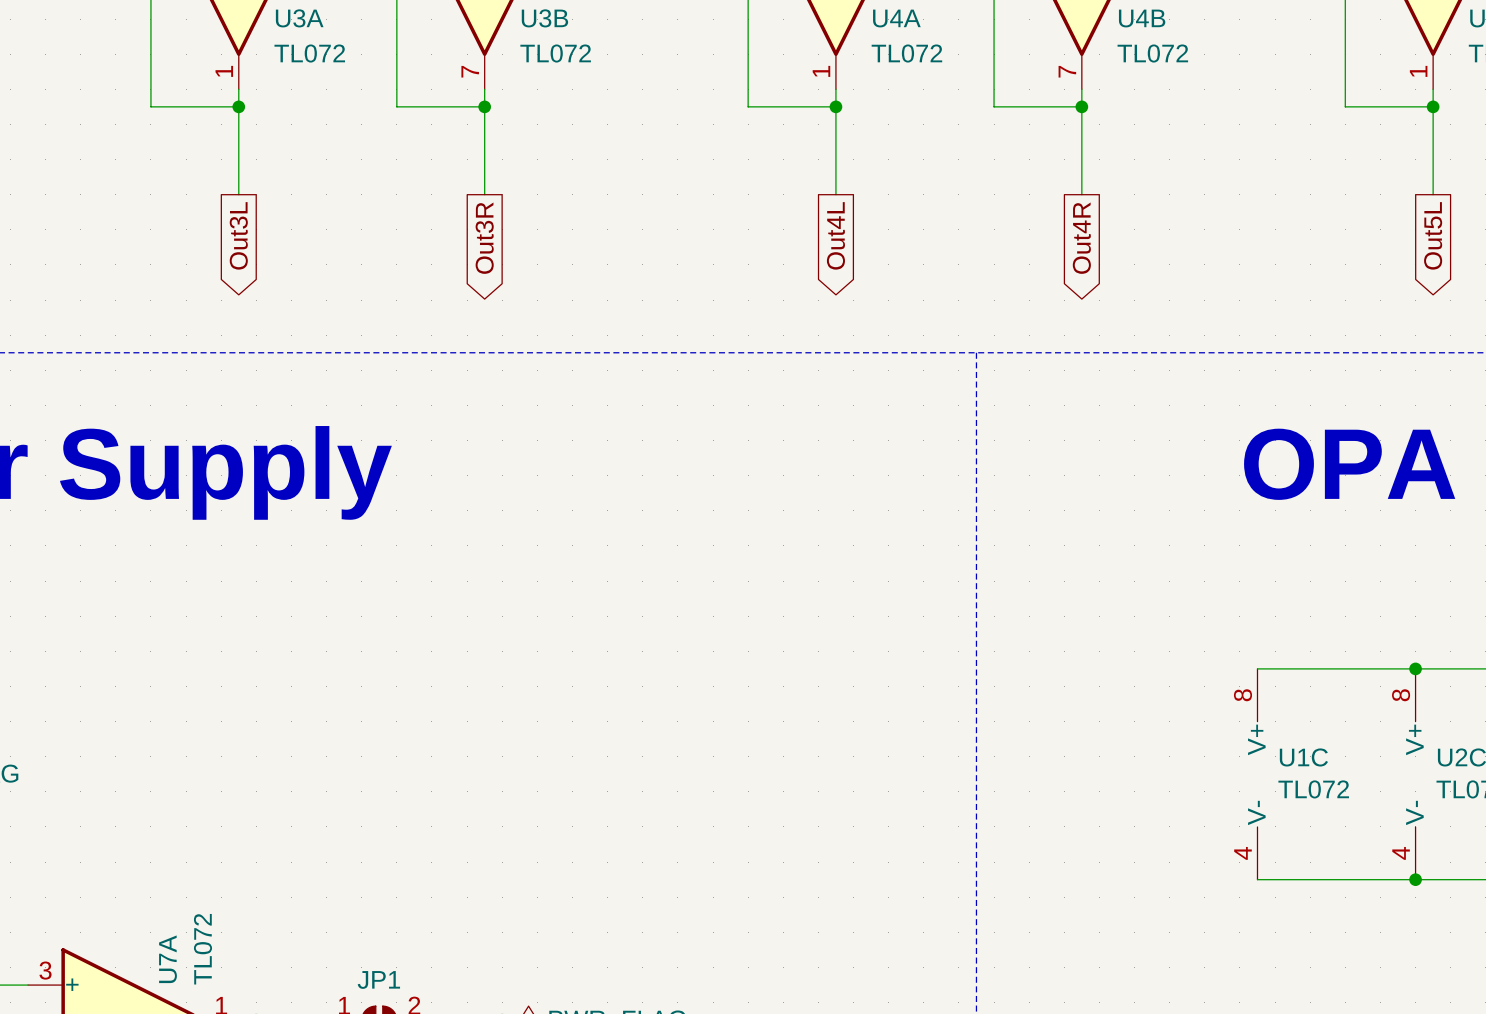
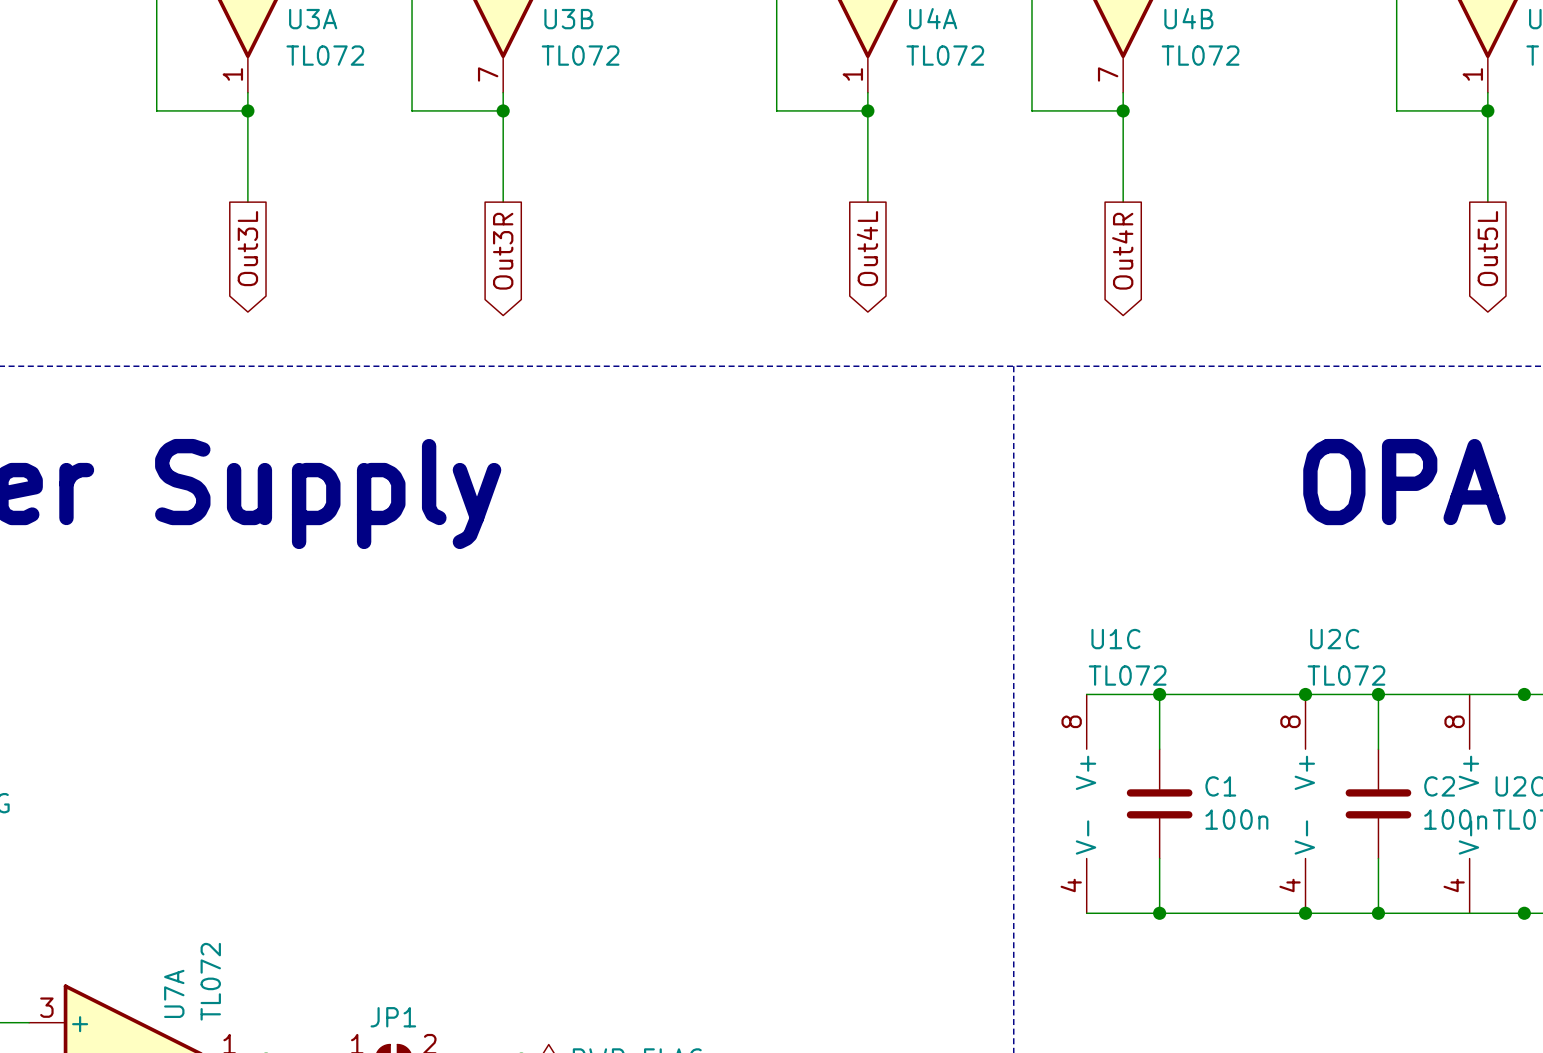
wire: none -> (1086, 694) (1305, 694)
wire: none -> (1159, 694) (1159, 749)
junction: none -> (1159, 694)
junction: none -> (1305, 694)
wire: none -> (1378, 694) (1378, 749)
junction: none -> (1378, 694)
junction: (1415, 668) -> none
junction: none -> (1524, 694)
U1C name: U1C (1303, 757) -> U2C (1334, 639)
U1C: none -> TL072 (1086, 803)
C1: none -> 100n (1159, 803)
C2: none -> 100n (1378, 803)
U1C value position: TL072 (1313, 789) -> TL072 (1346, 675)
wire: none -> (1159, 858) (1159, 913)
wire: none -> (1378, 858) (1378, 913)
wire: none -> (1086, 913) (1305, 913)
junction: none -> (1159, 913)
junction: none -> (1305, 913)
junction: none -> (1378, 913)
junction: (1415, 879) -> none
junction: none -> (1524, 913)

